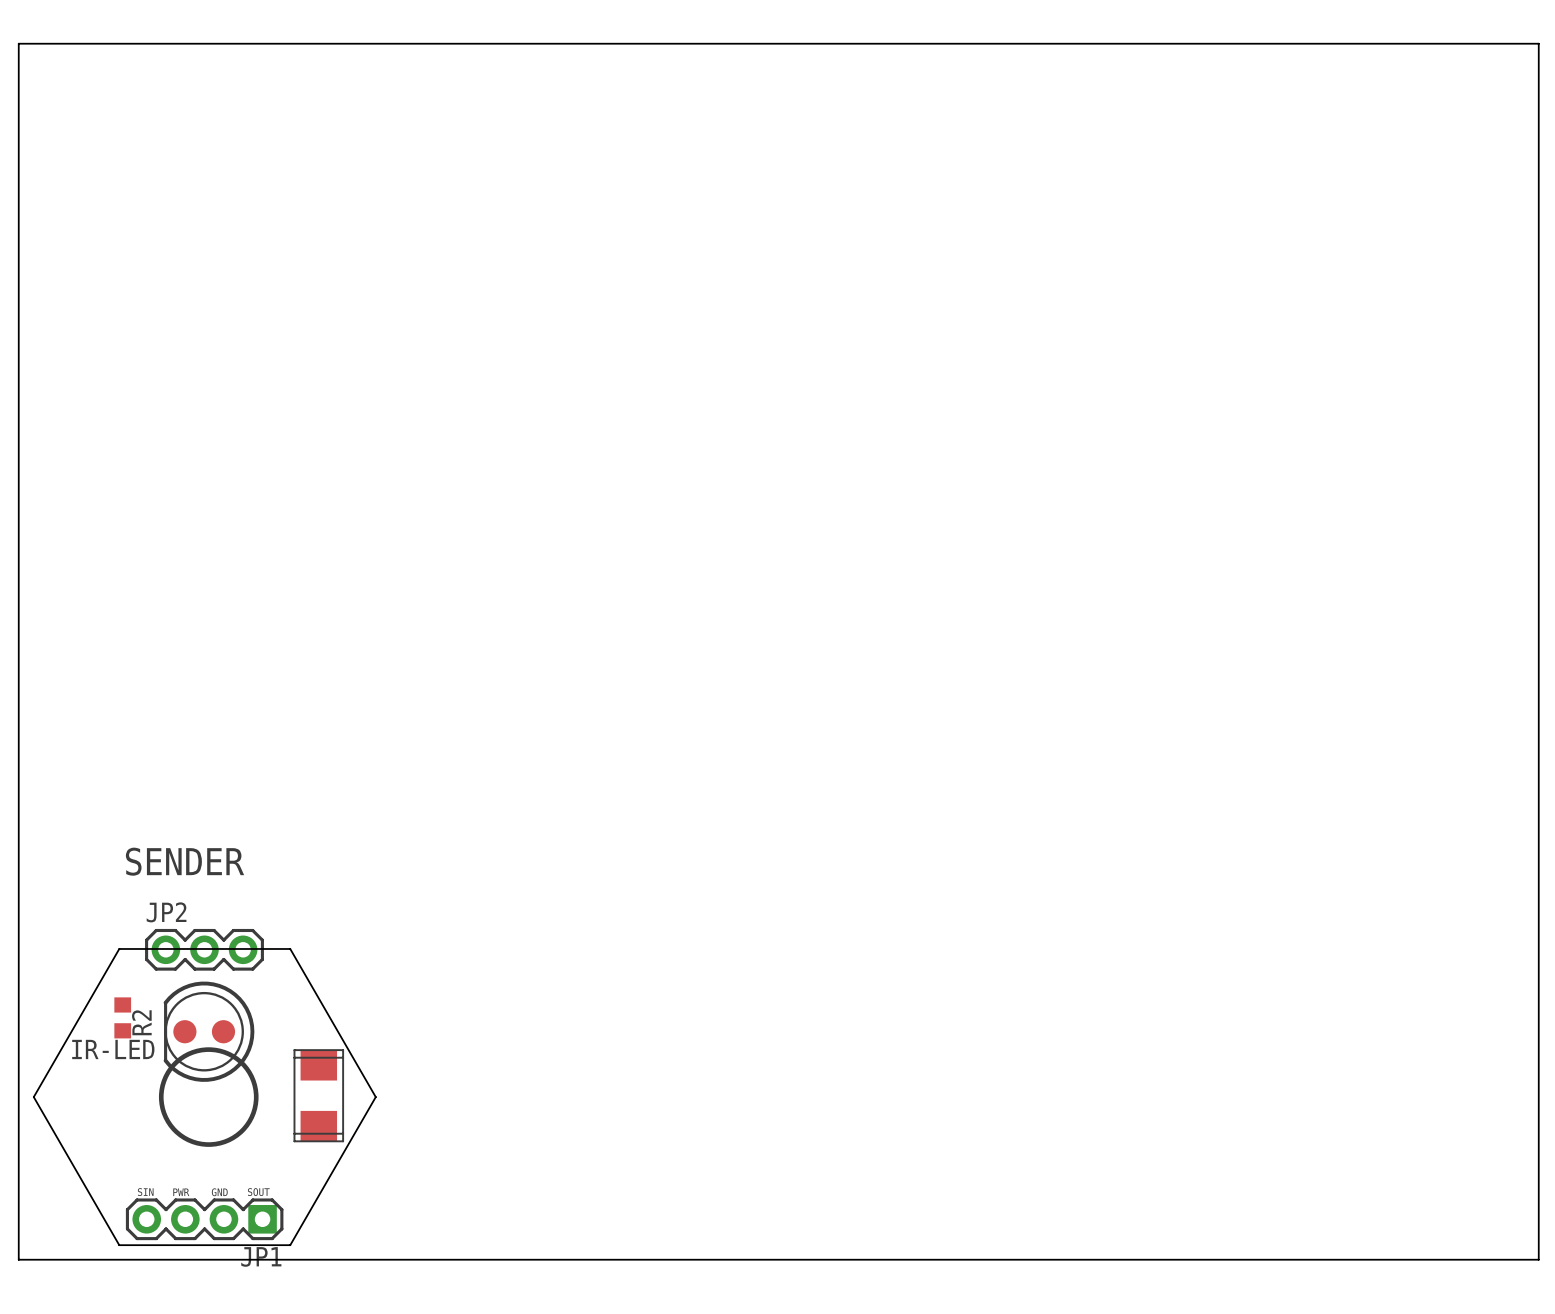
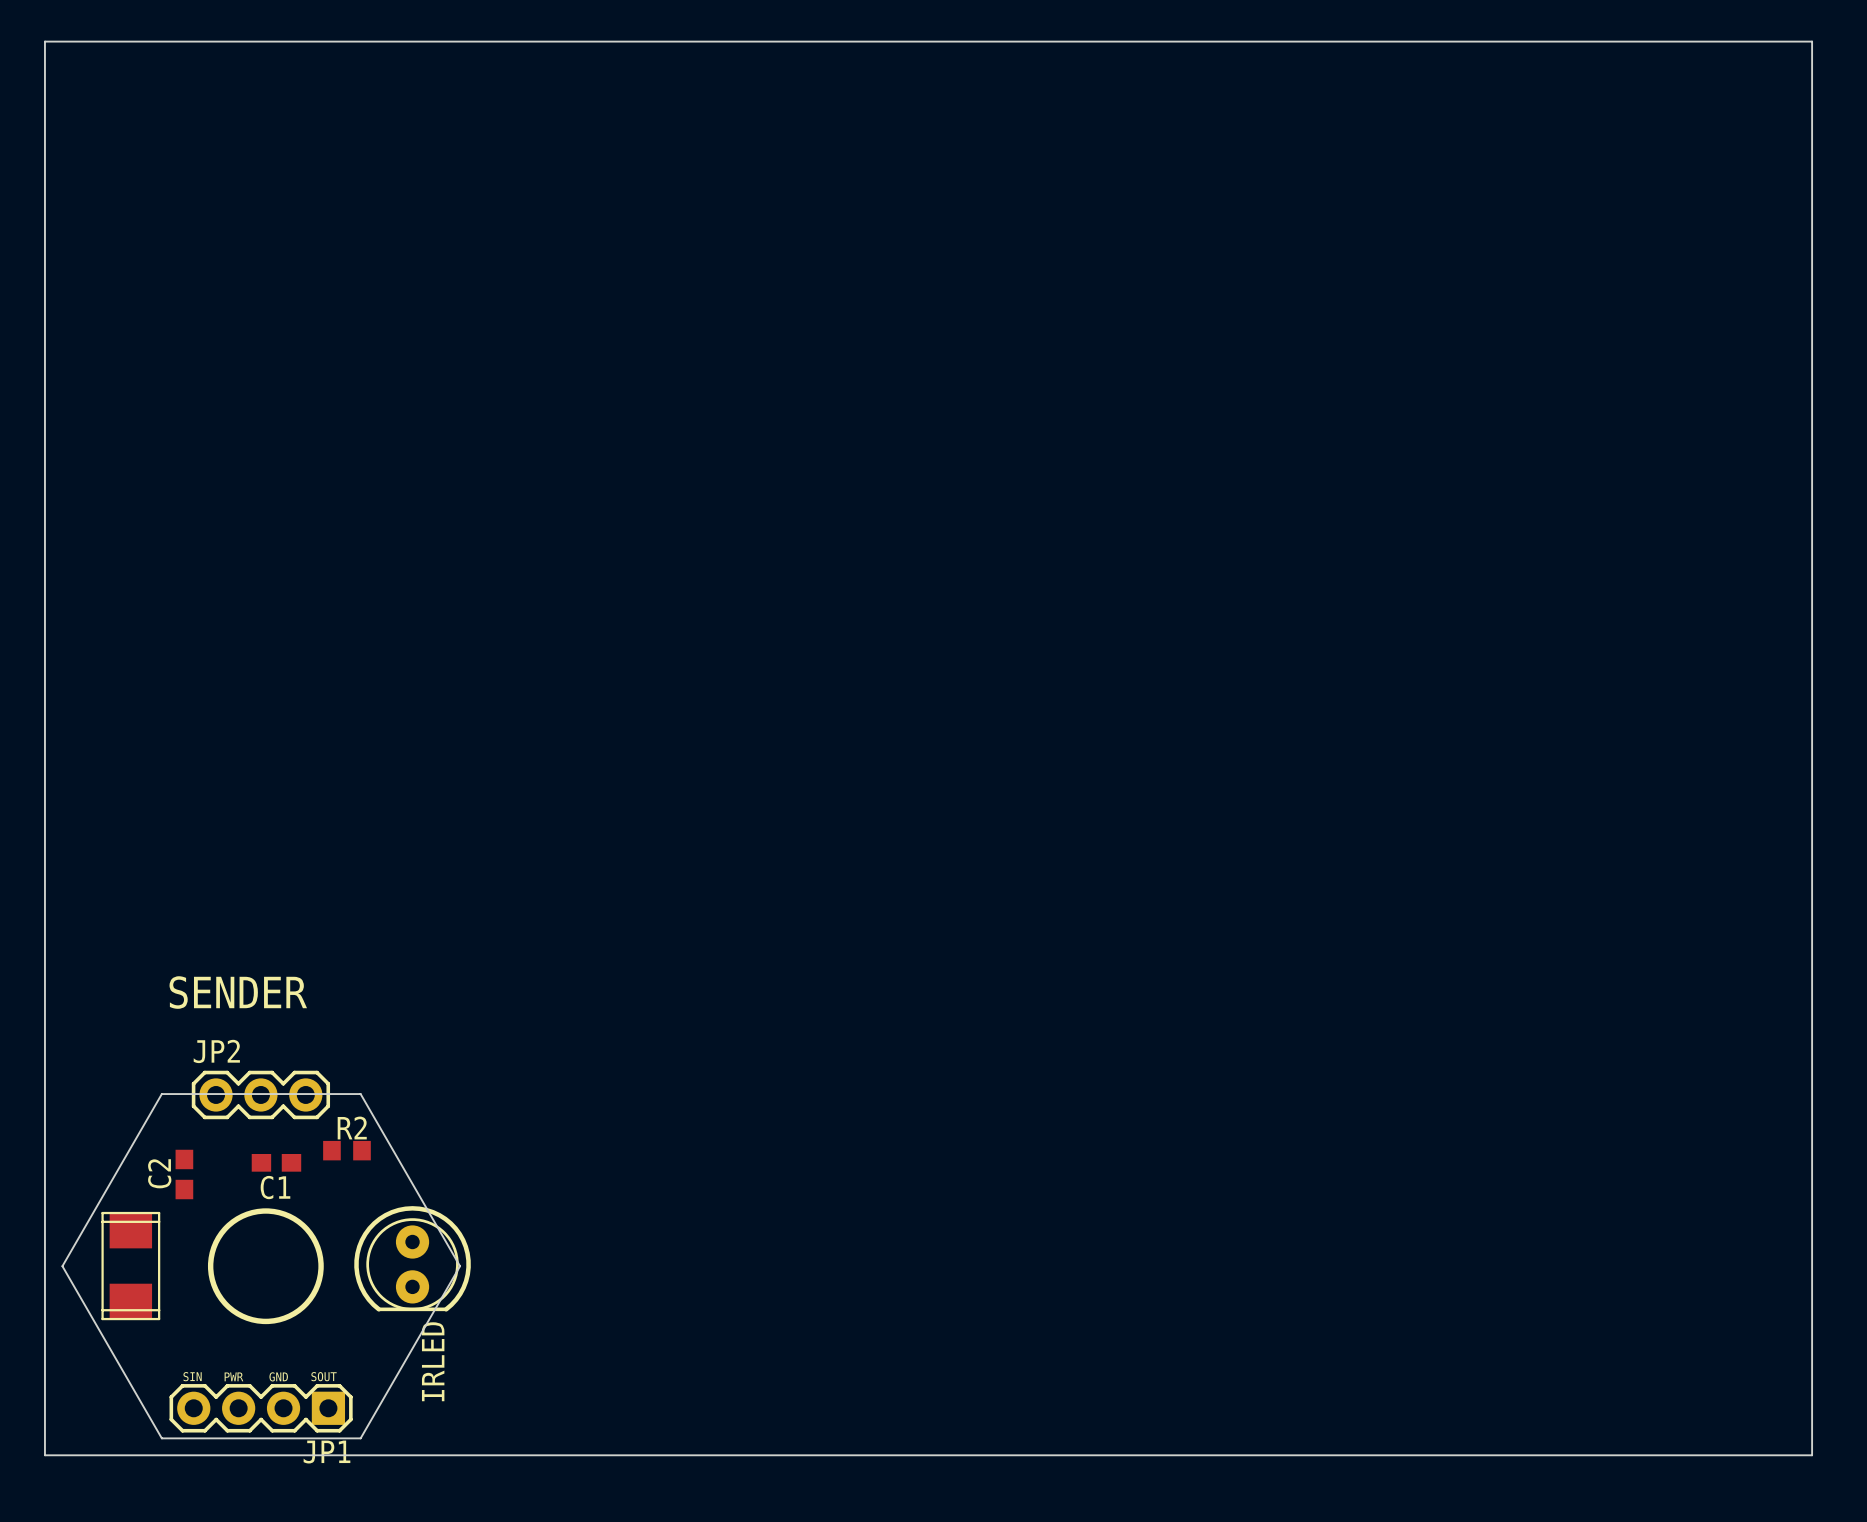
C1: none -> (276, 1162)
R2 rotation: 0° (122, 1017) -> 90° clockwise (346, 1150)
R2 position: (122, 1017) -> (346, 1150)
C2: none -> (184, 1174)
R2 name position: R2 (141, 1022) -> R2 (352, 1128)
IR-LED: (209, 1031) -> none
IRLED: none -> (412, 1258)
part position: (318, 1095) -> (130, 1266)

